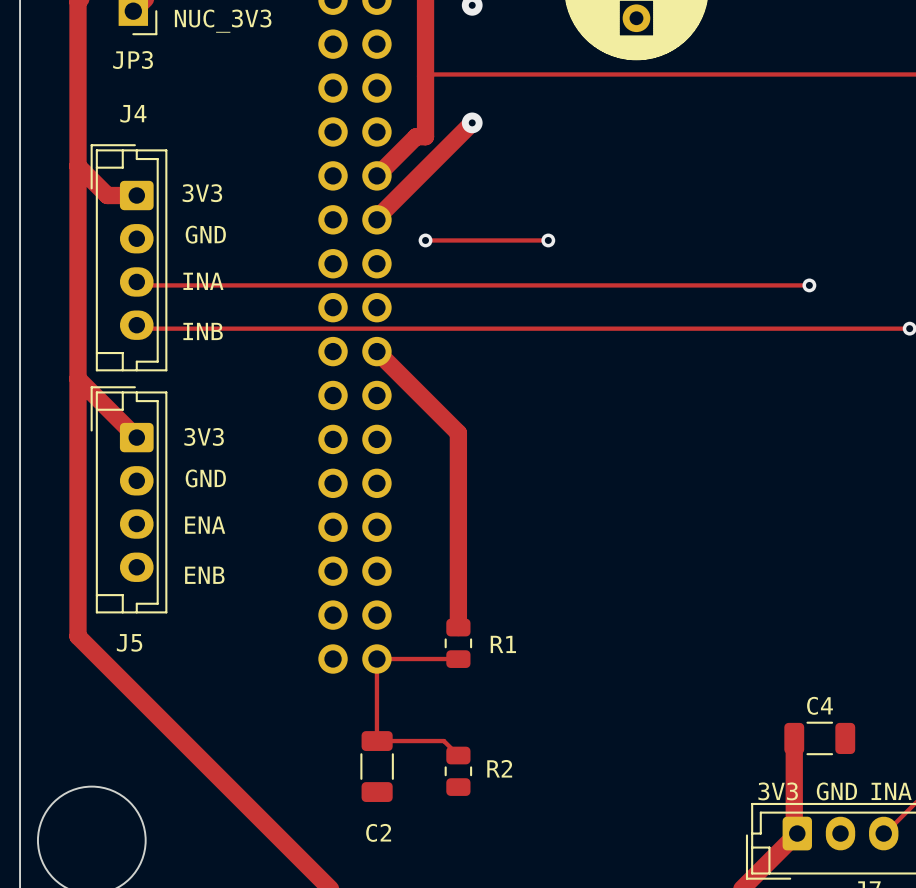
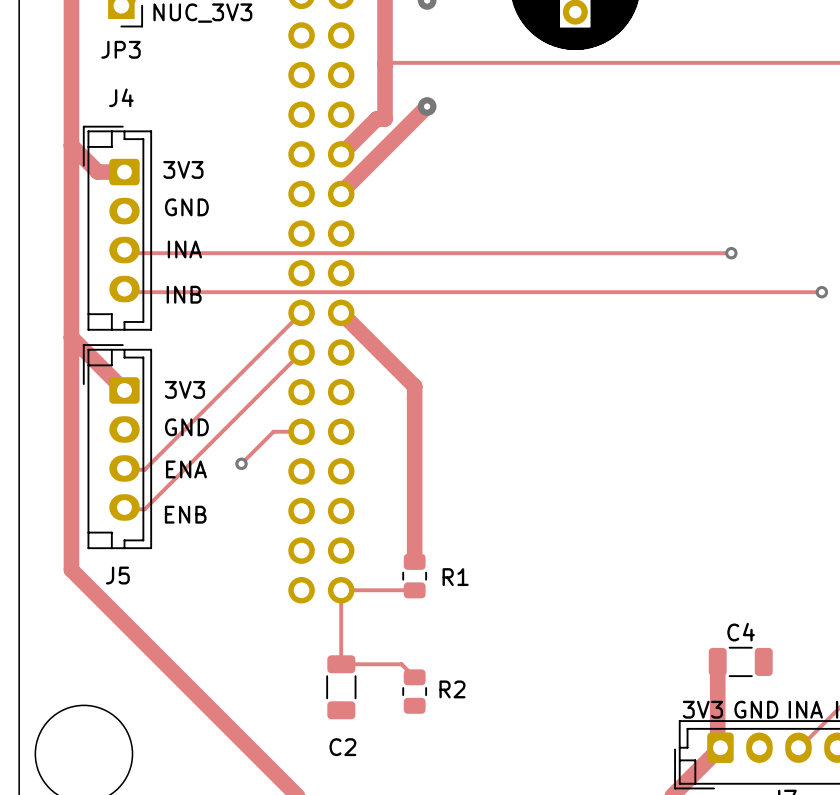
track: (425, 240) (548, 240) -> none
via: (425, 240) -> none
via: (548, 240) -> none
track: none -> (301, 312) (144, 469) (124, 469)
track: none -> (301, 352) (144, 509) (124, 509)
track: none -> (301, 431) (273, 431) (241, 463)
via: none -> (241, 463)

